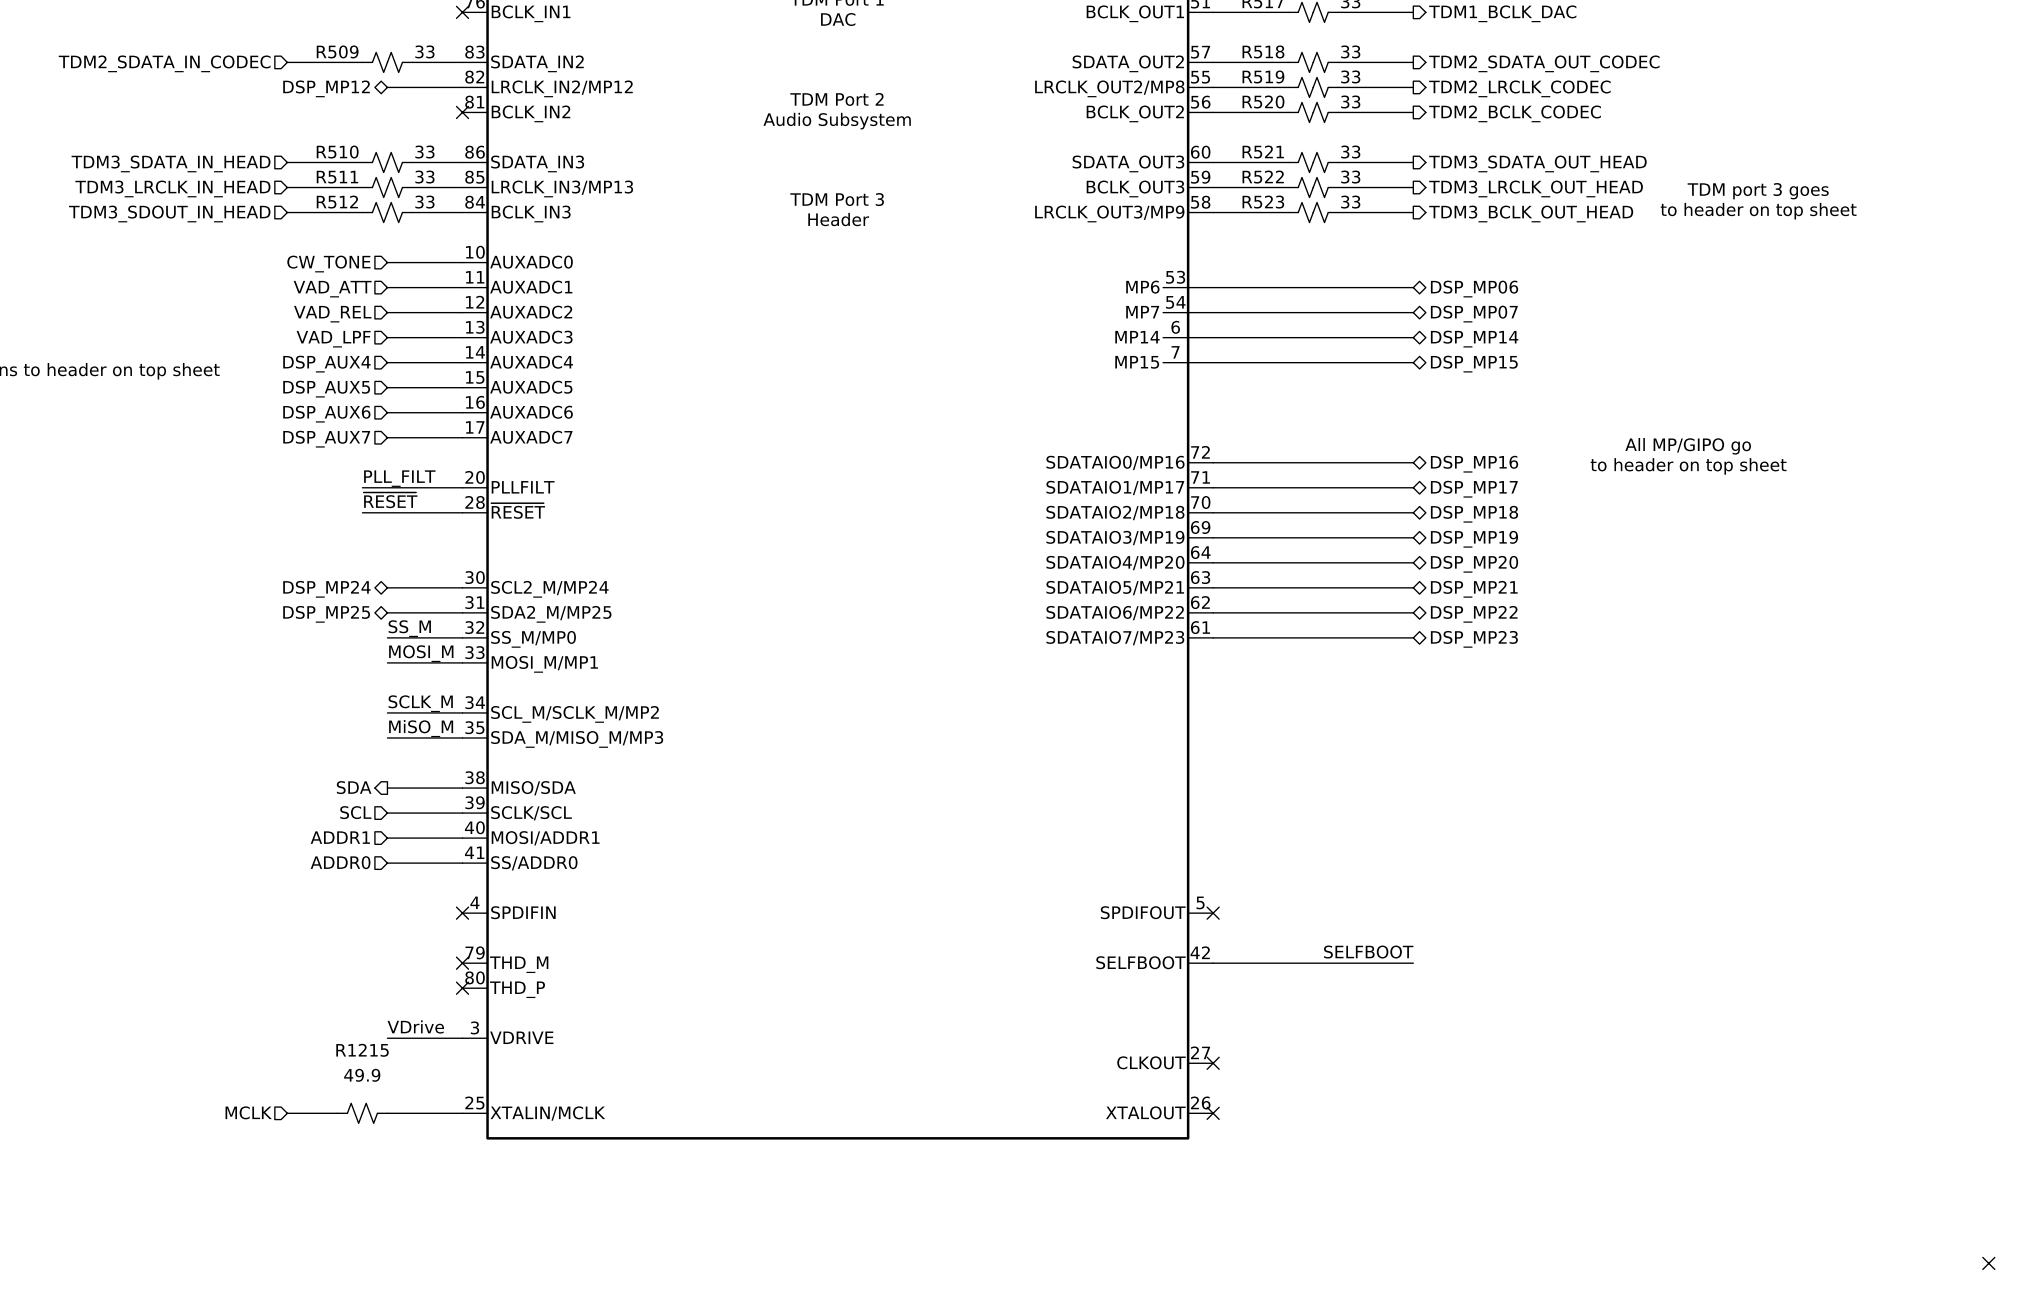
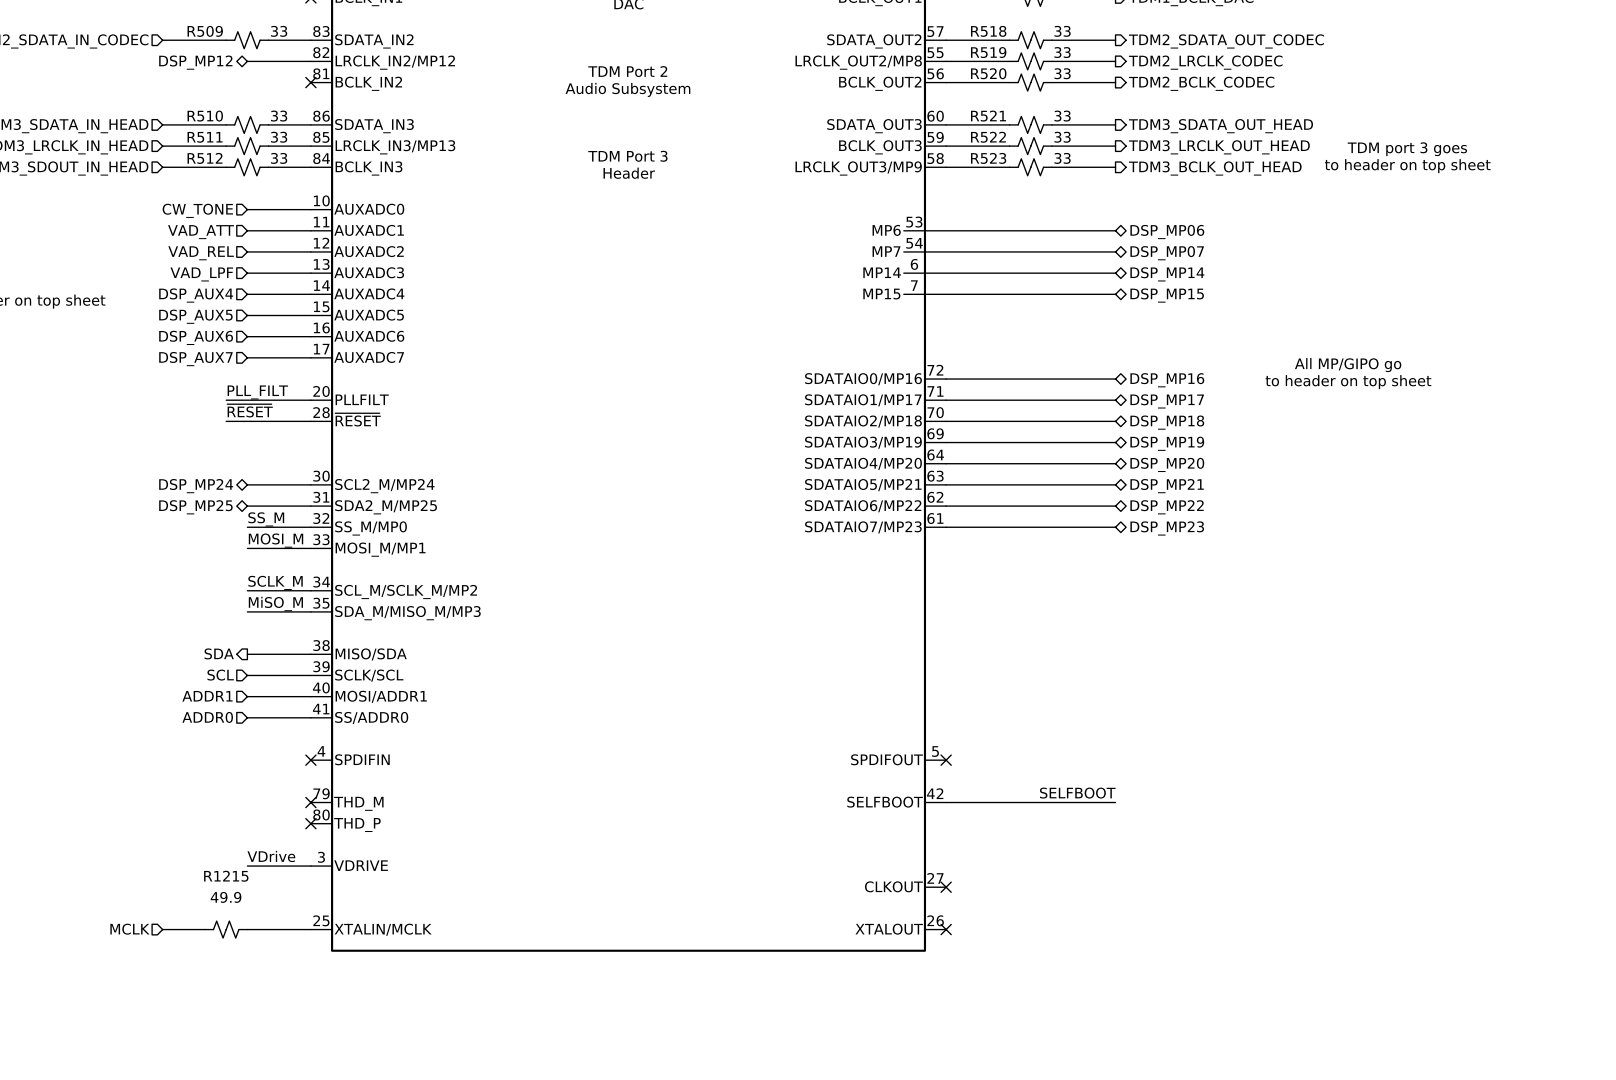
no-connect mark: (1988, 1263) -> none

